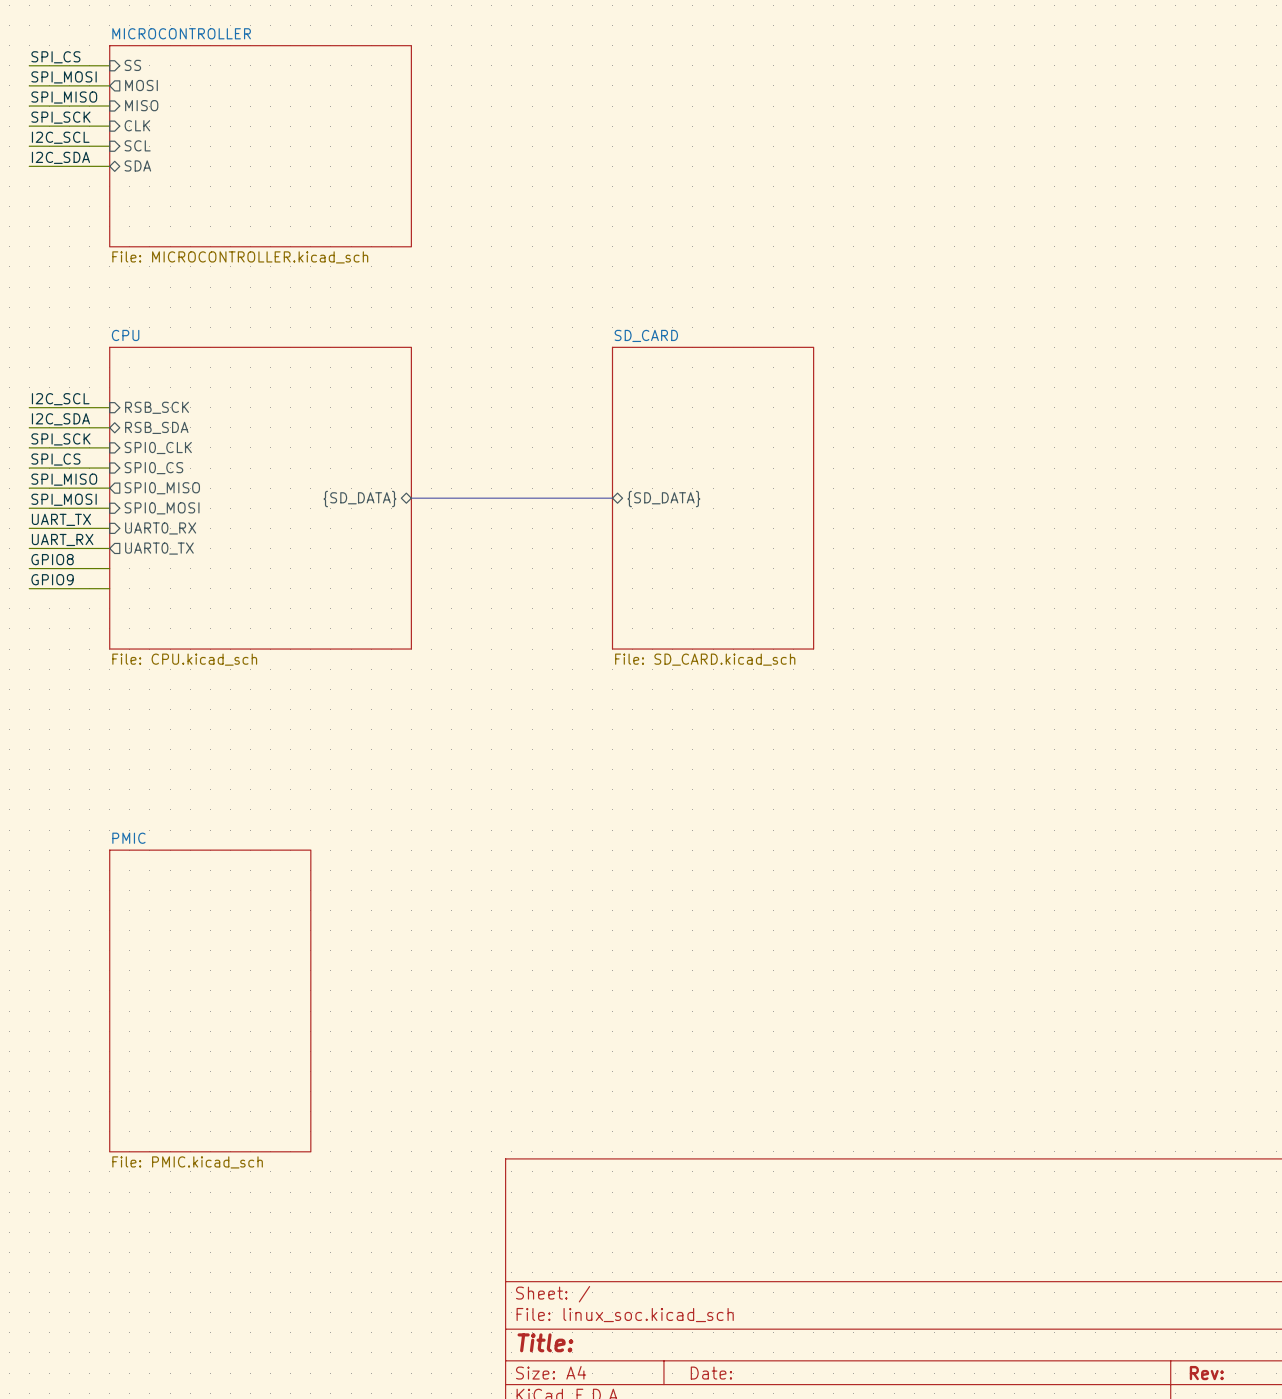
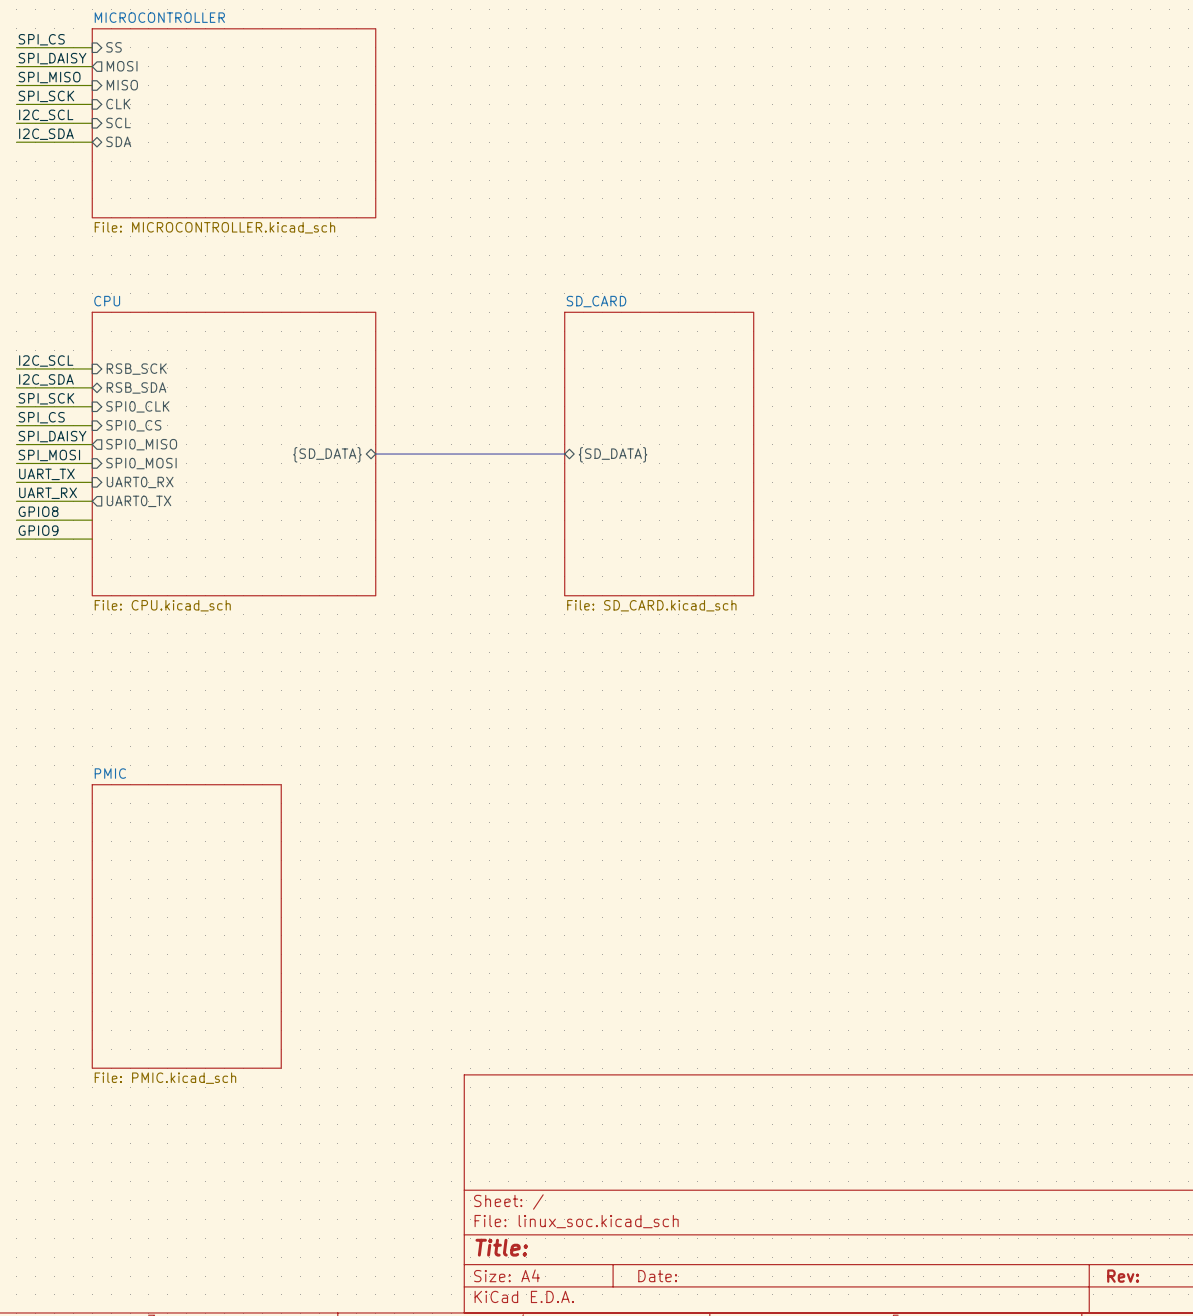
label: SPI_MOSI (64, 77) -> SPI_DAISY (52, 58)
label: SPI_MISO (64, 479) -> SPI_DAISY (52, 436)

